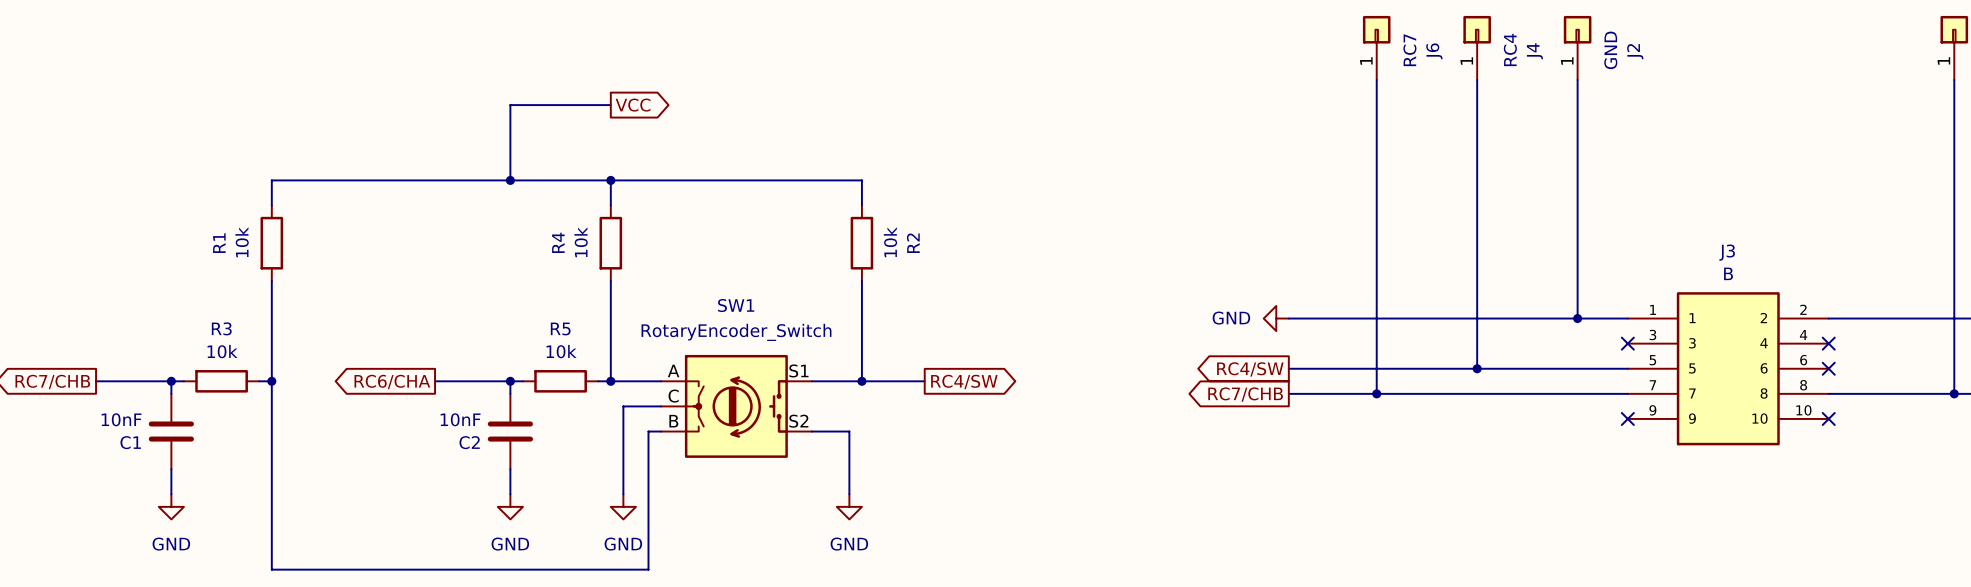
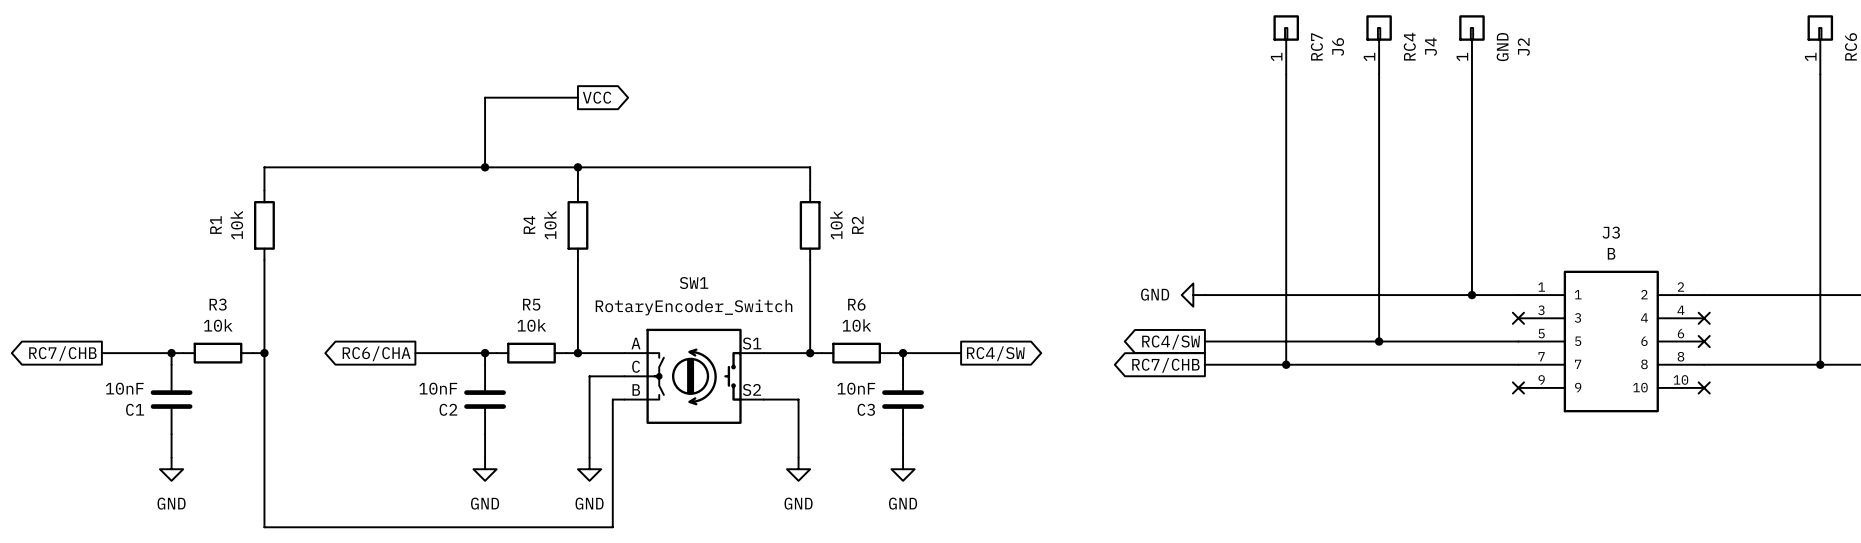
wire: (874, 381) (924, 381) -> none
R6: none -> 10k (856, 353)
wire: none -> (891, 353) (961, 353)
wire: none -> (903, 353) (903, 364)
junction: none -> (903, 353)
global label position: RC4/SW (964, 381) -> RC4/SW (995, 353)
C3: none -> 10nF (903, 399)
wire: none -> (903, 434) (903, 457)
power symbol: none -> GND (903, 469)

